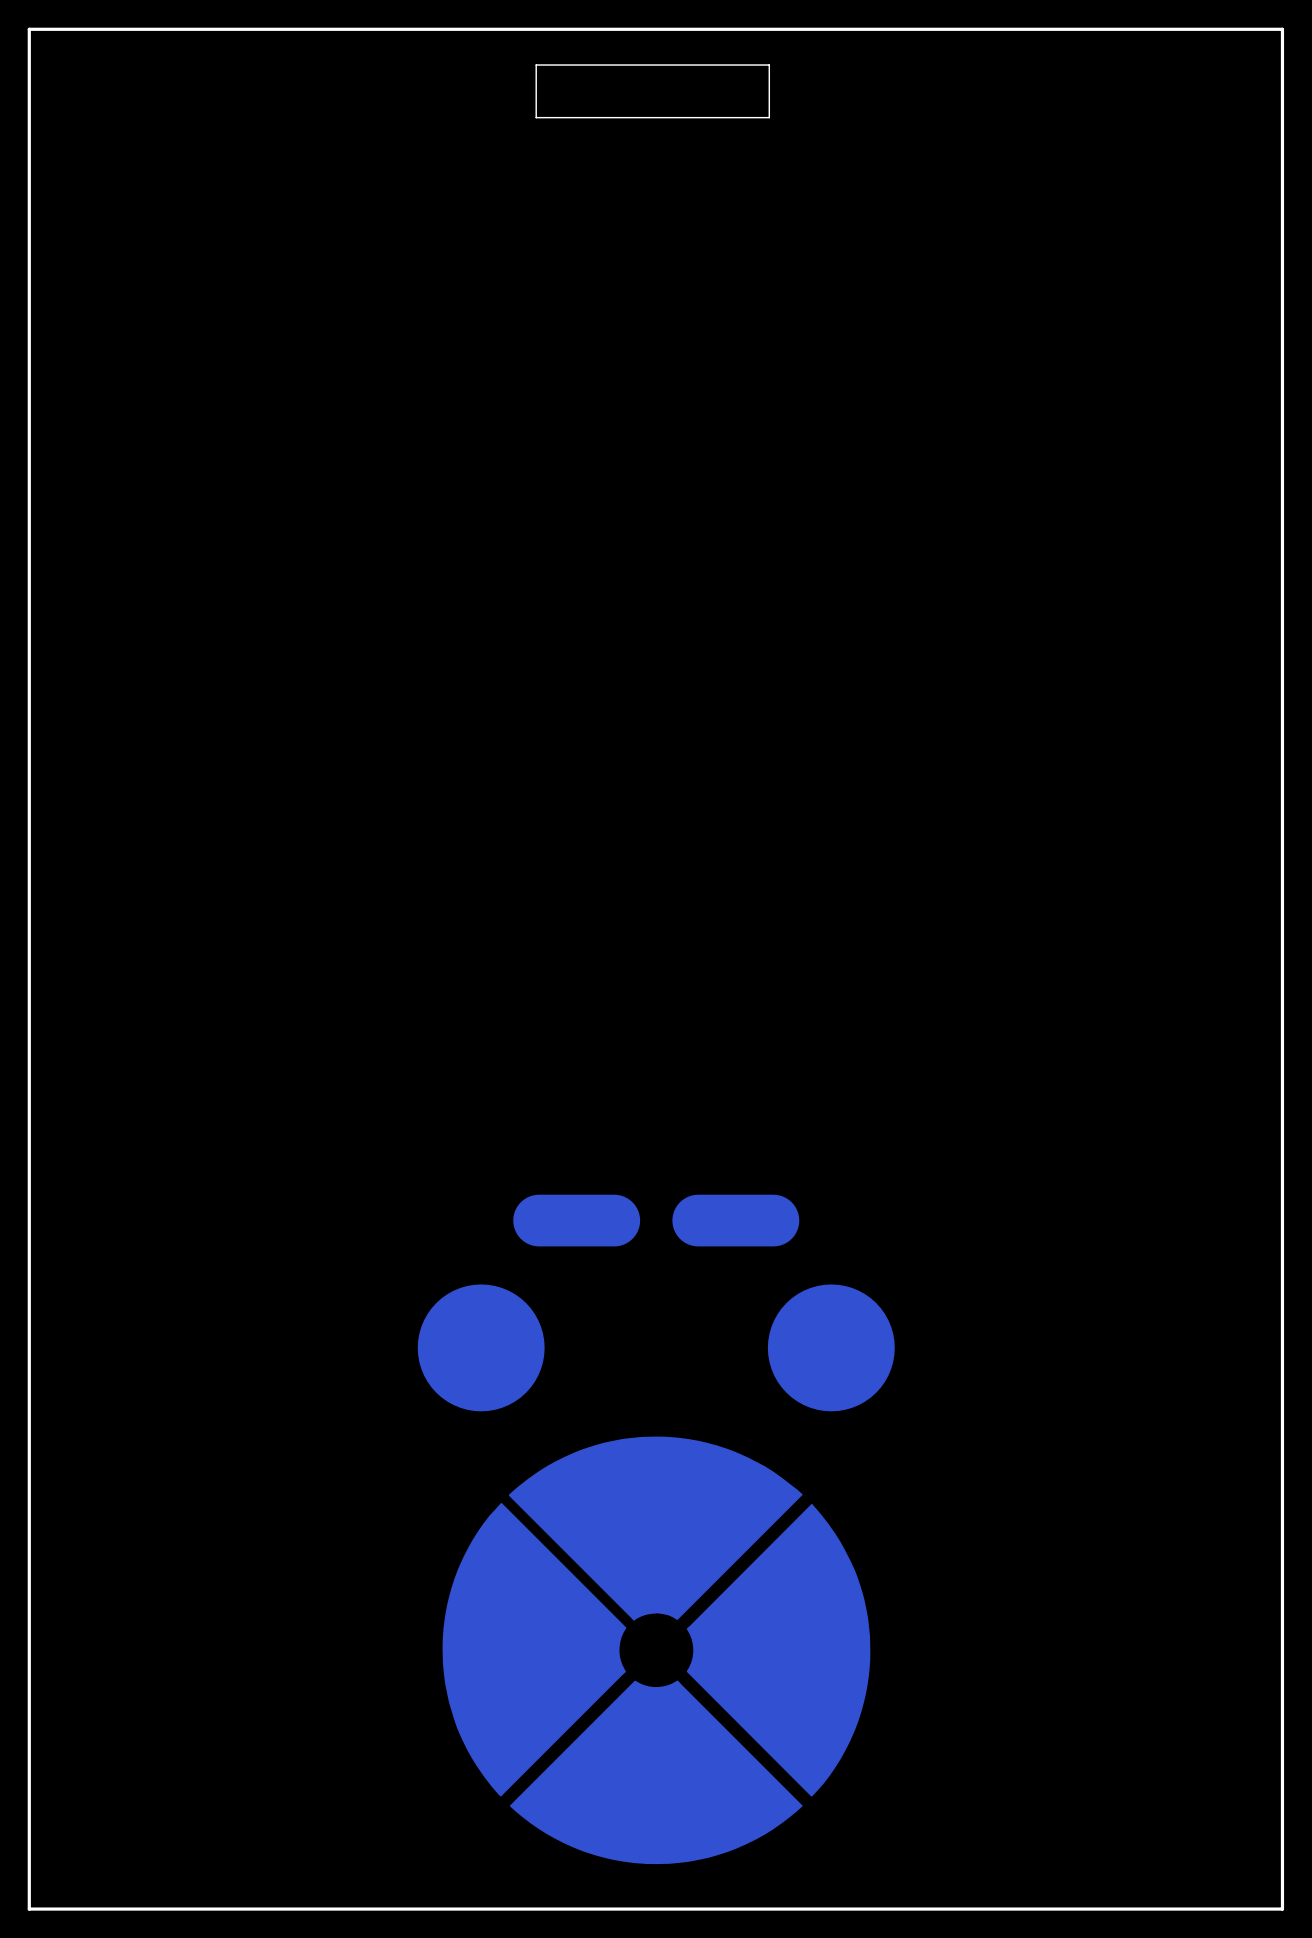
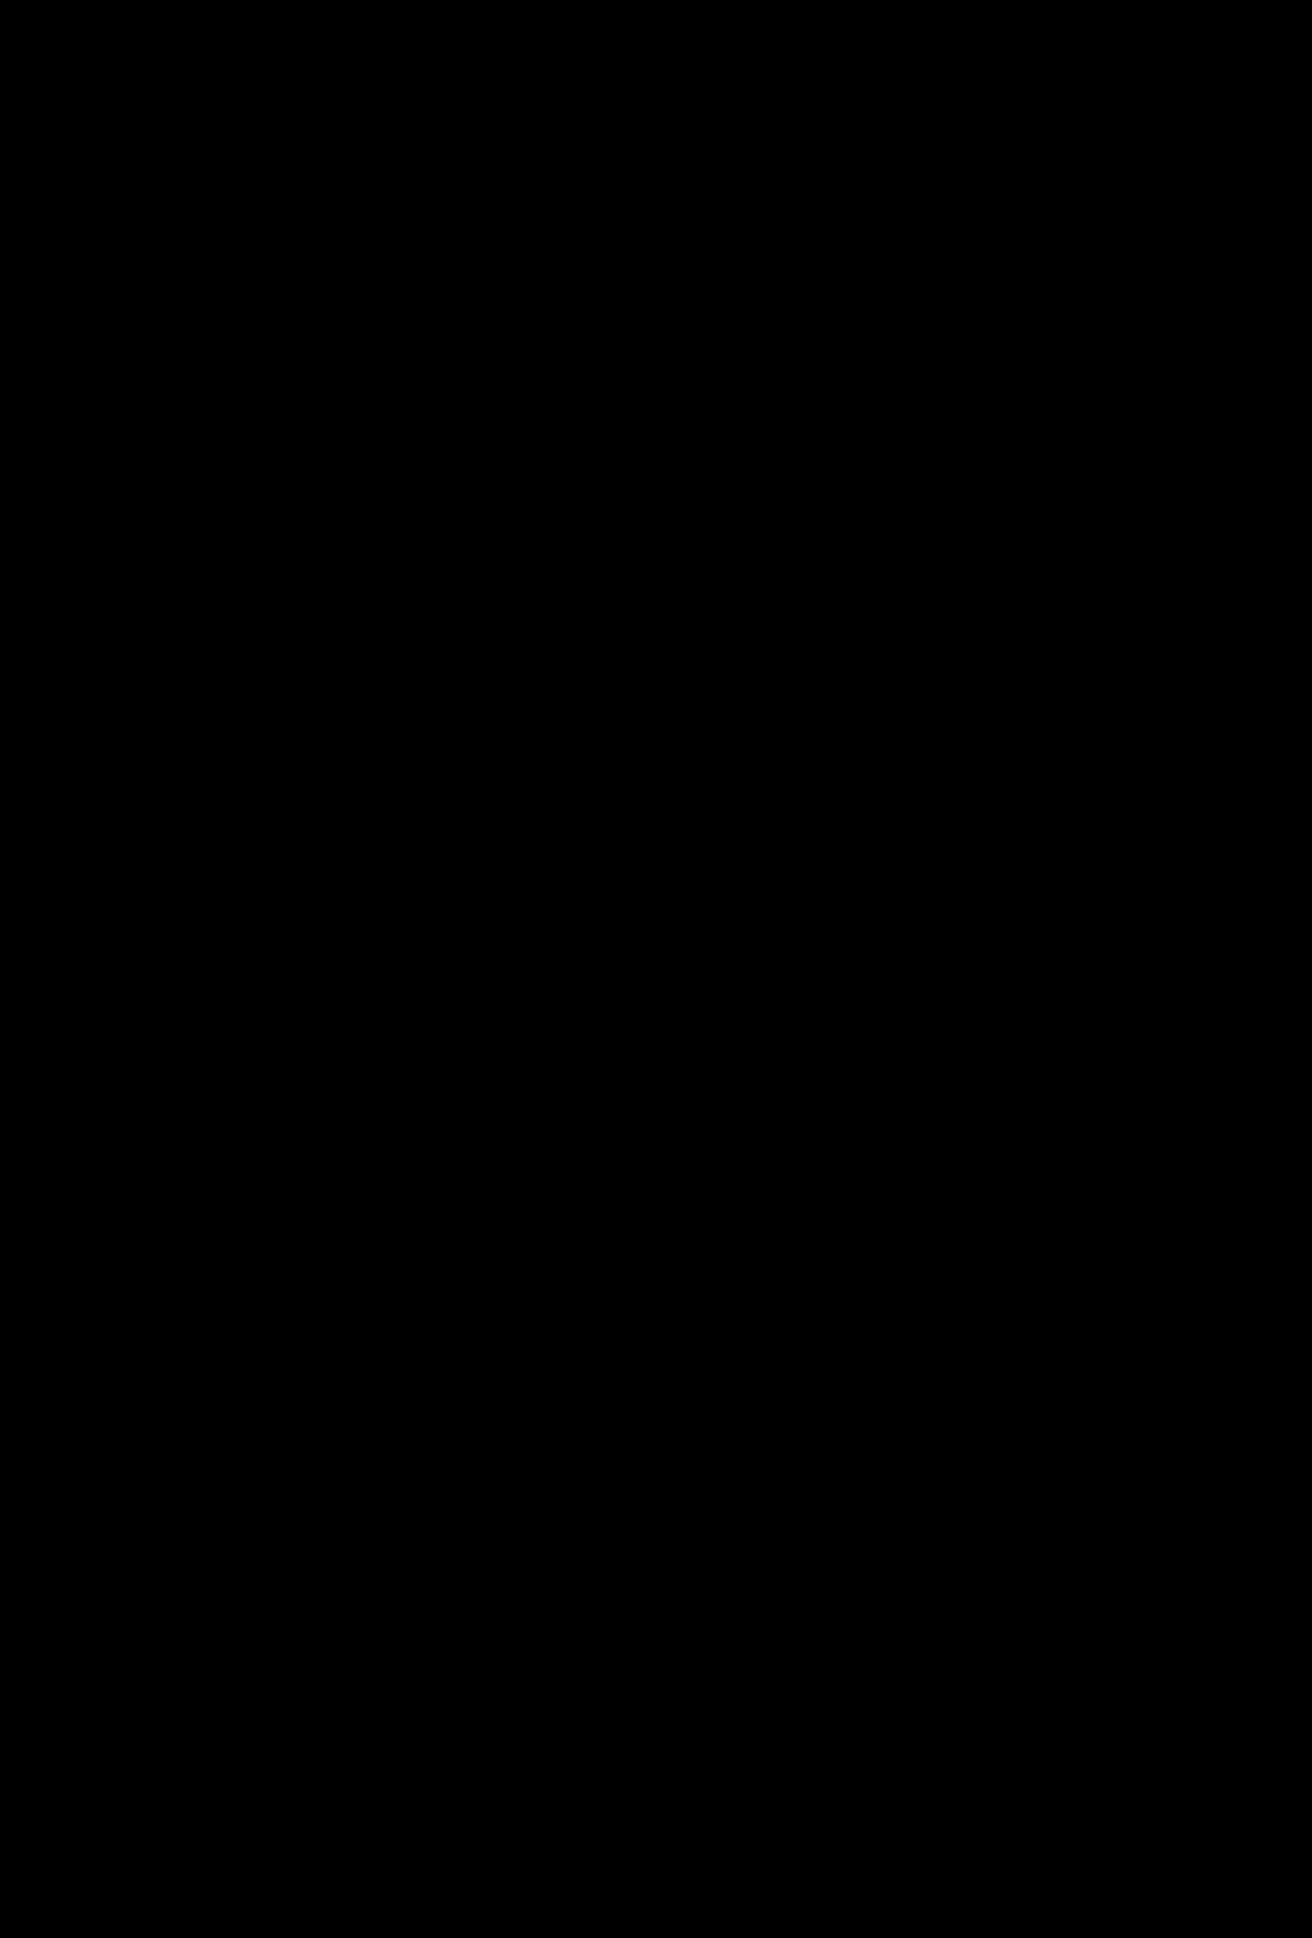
board edge: (29, 29) (29, 1909) (1282, 1909) (1282, 29) (29, 29) -> none
board edge: (536, 65) (536, 117) (769, 117) (769, 65) (536, 65) -> none
part: (576, 1220) -> none
part: (735, 1220) -> none
part: (481, 1347) -> none
part: (831, 1347) -> none
part: (656, 1650) -> none

